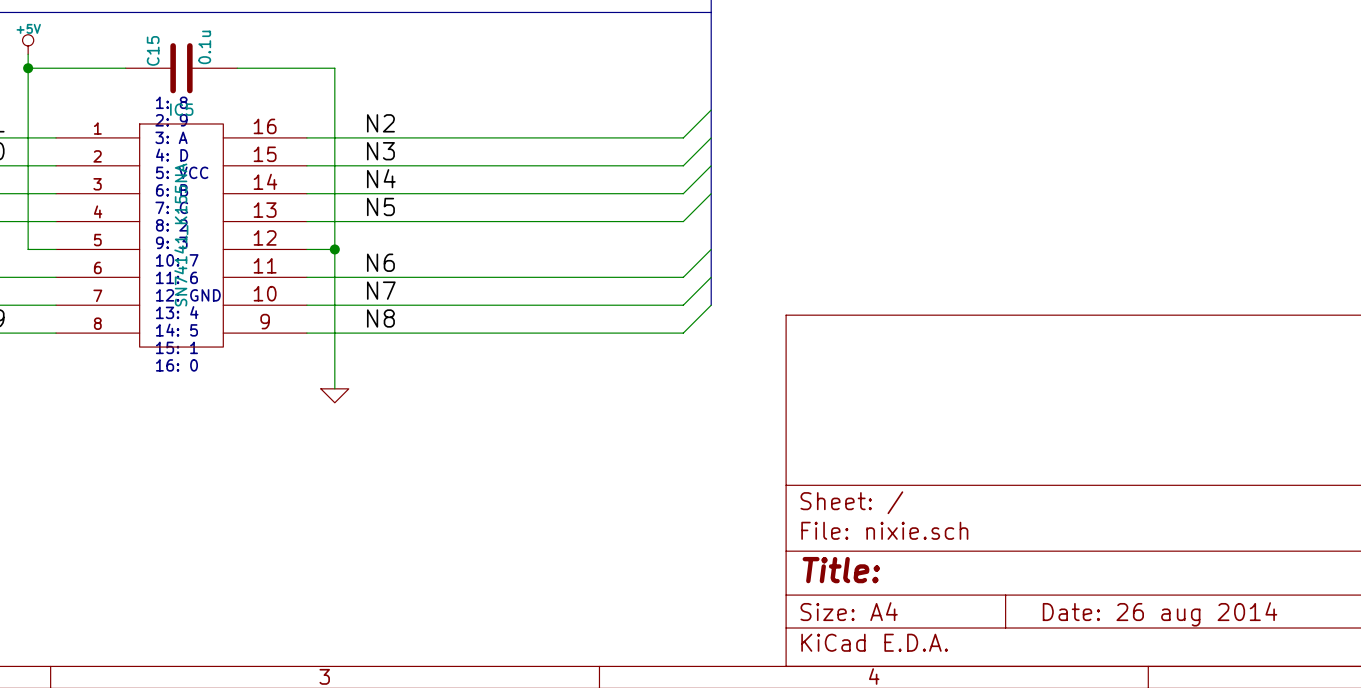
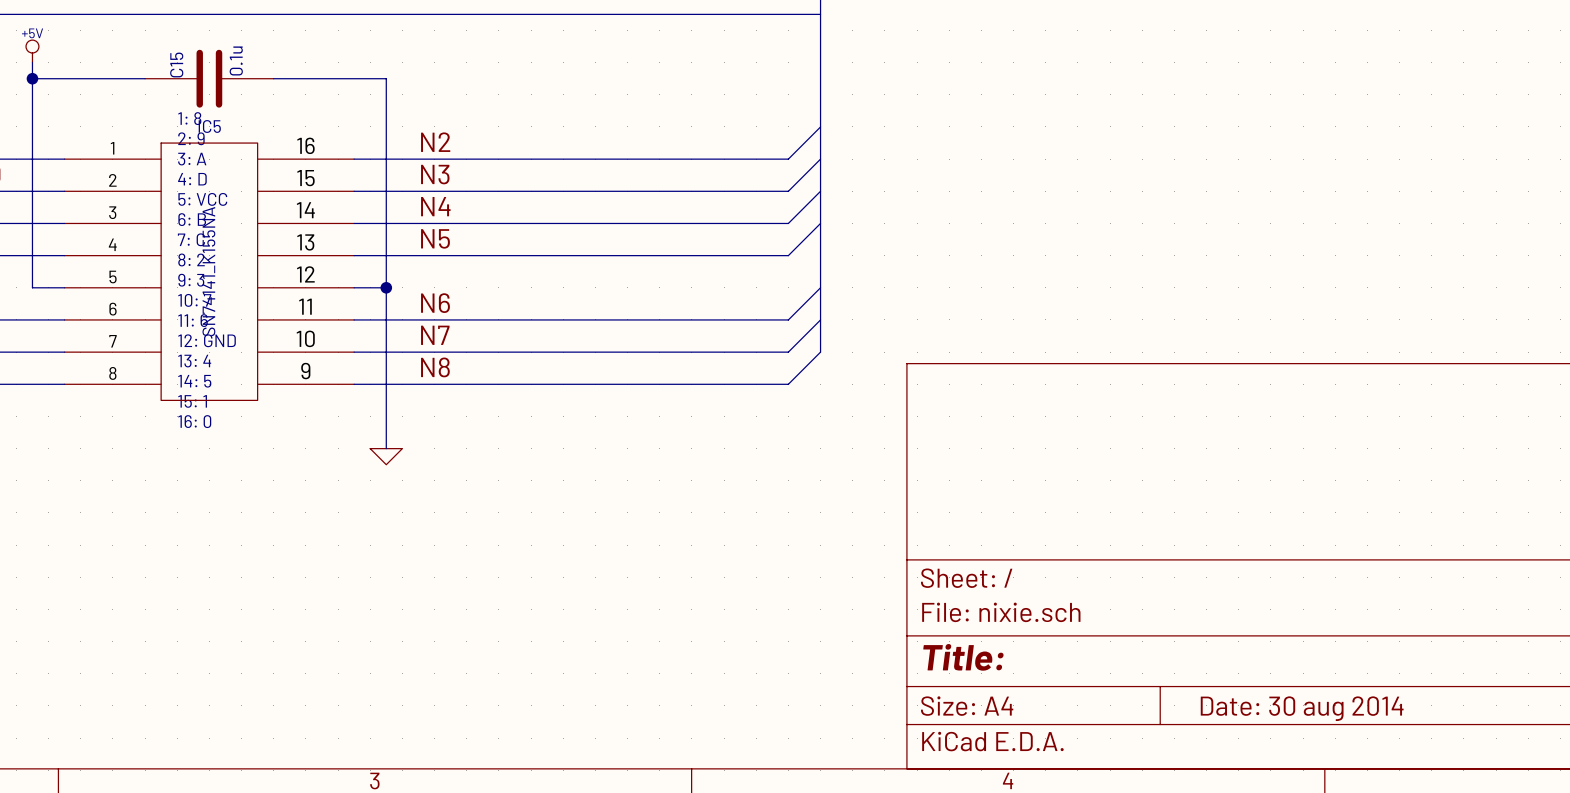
title block: Date: 26 aug 2014 (1160, 614) -> Date: 30 aug 2014 (1302, 708)

